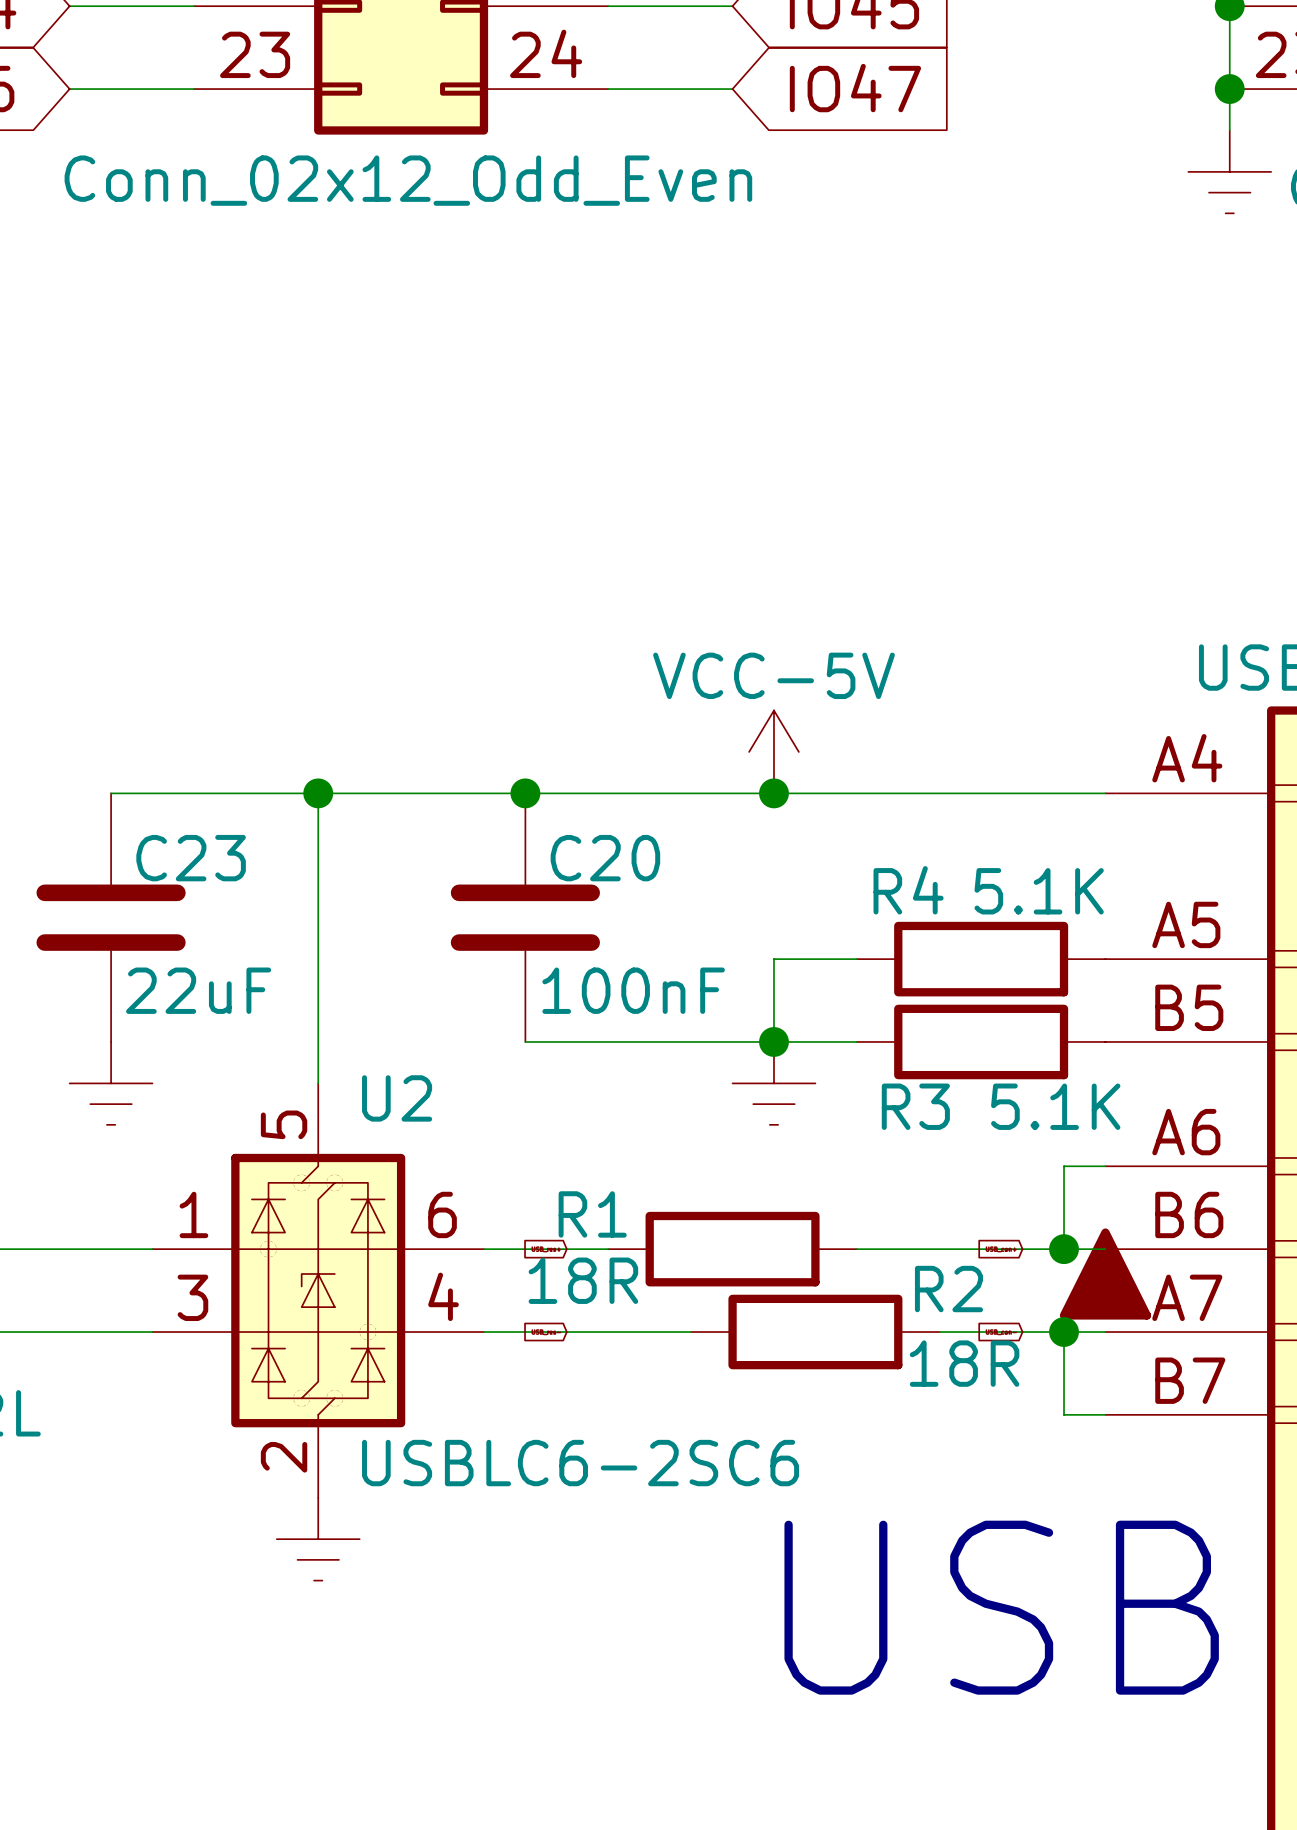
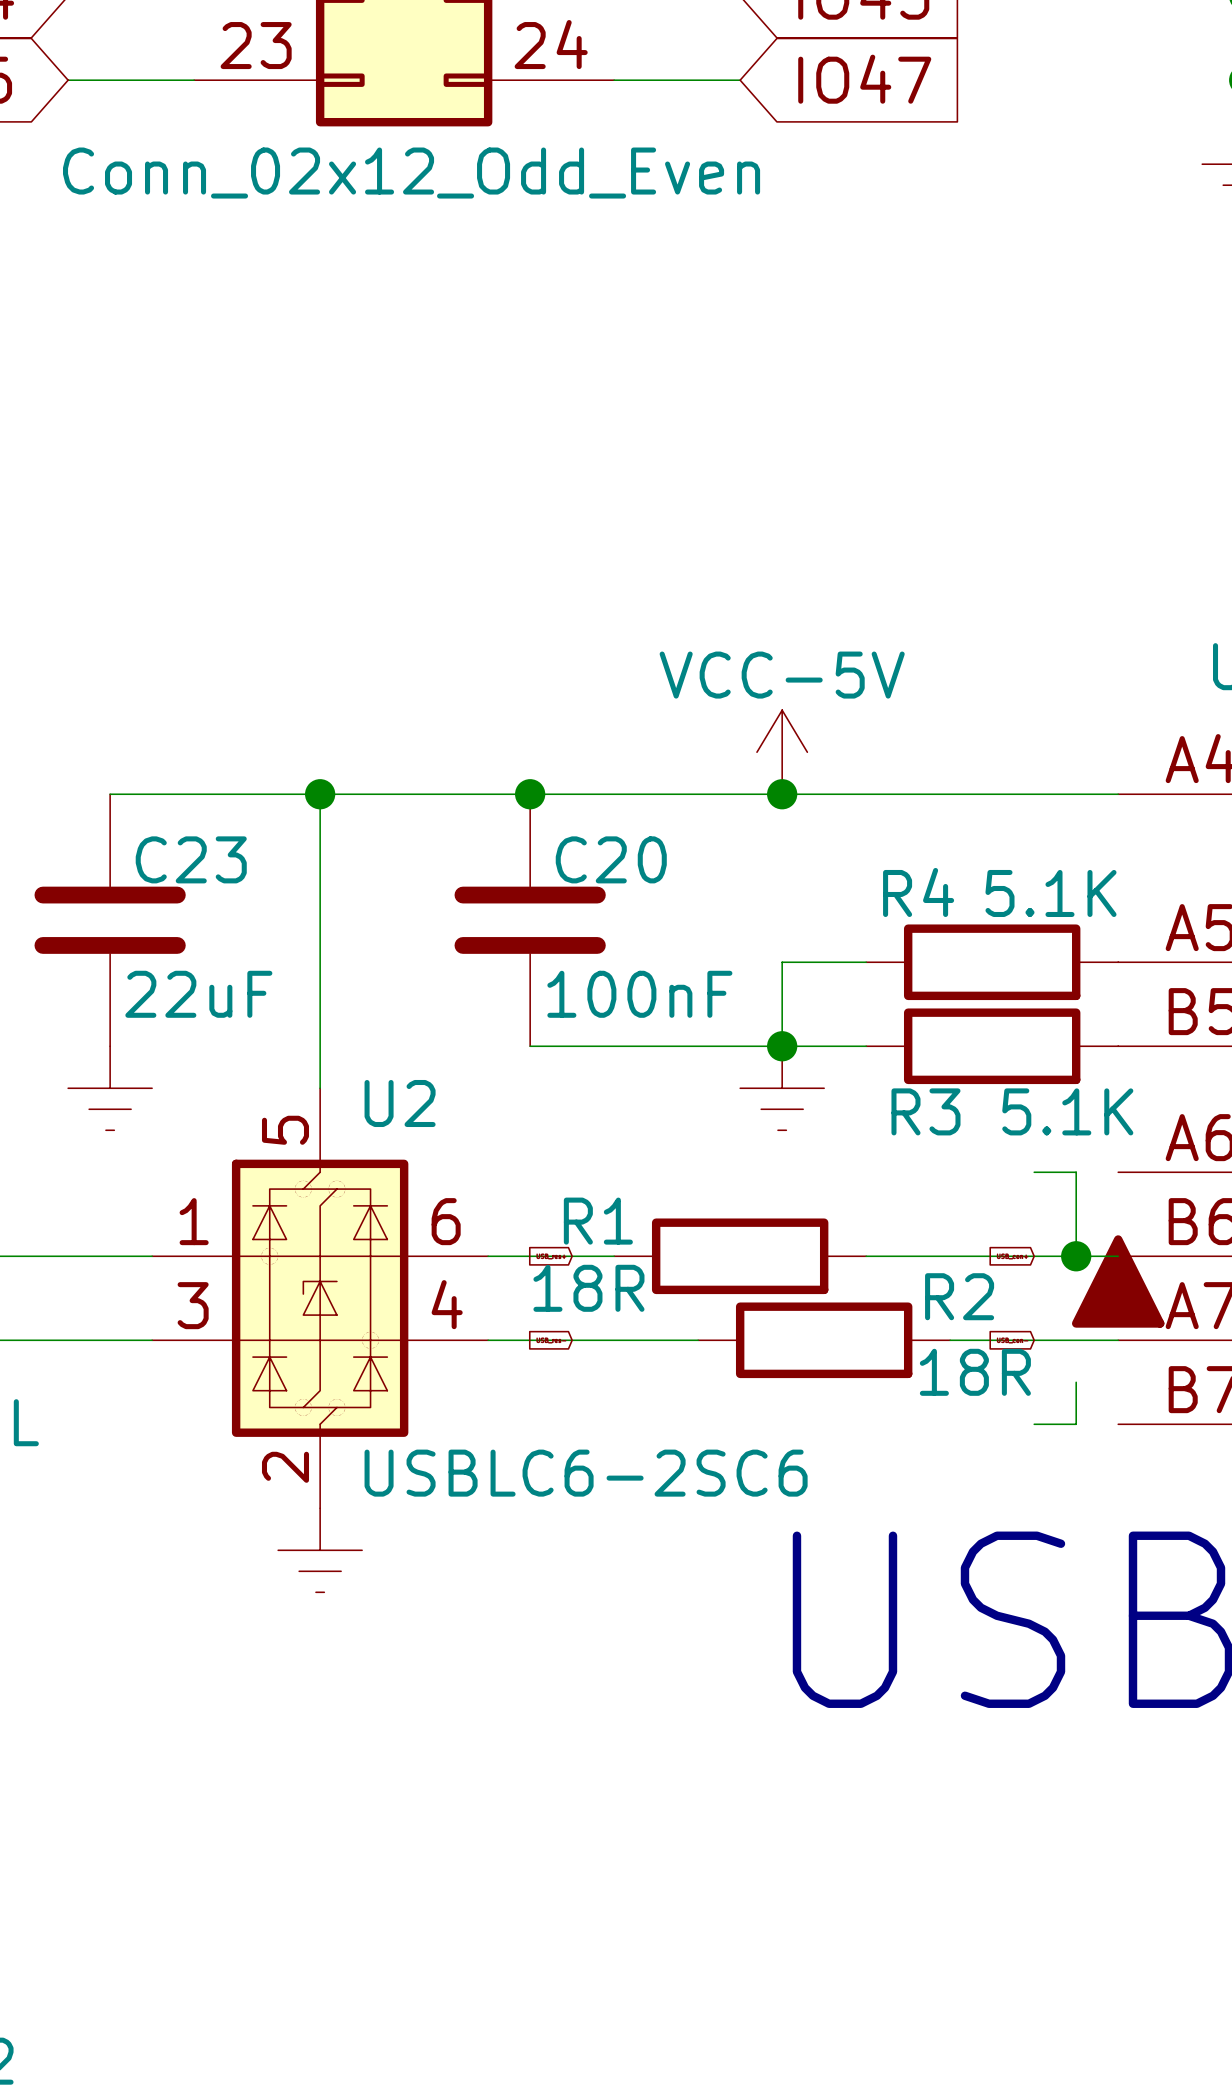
wire: (1064, 1166) (1105, 1166) -> (1076, 1172) (1034, 1172)
wire: (1064, 1332) (1064, 1373) -> none
junction: (1064, 1332) -> none
wire: (1064, 1414) (1105, 1414) -> (1076, 1424) (1034, 1424)

